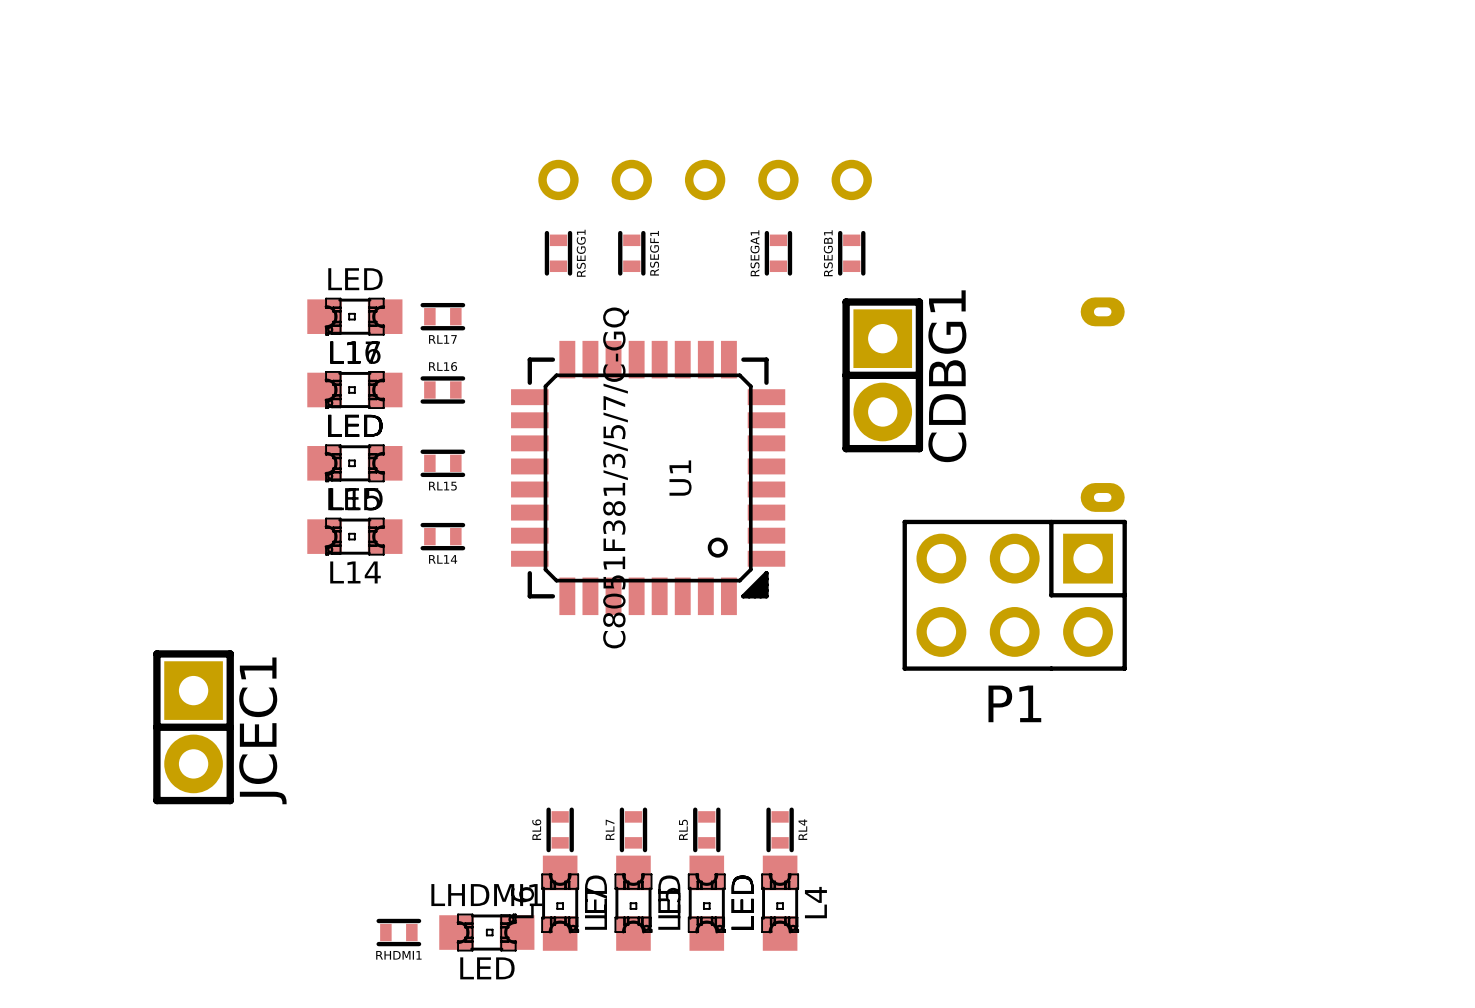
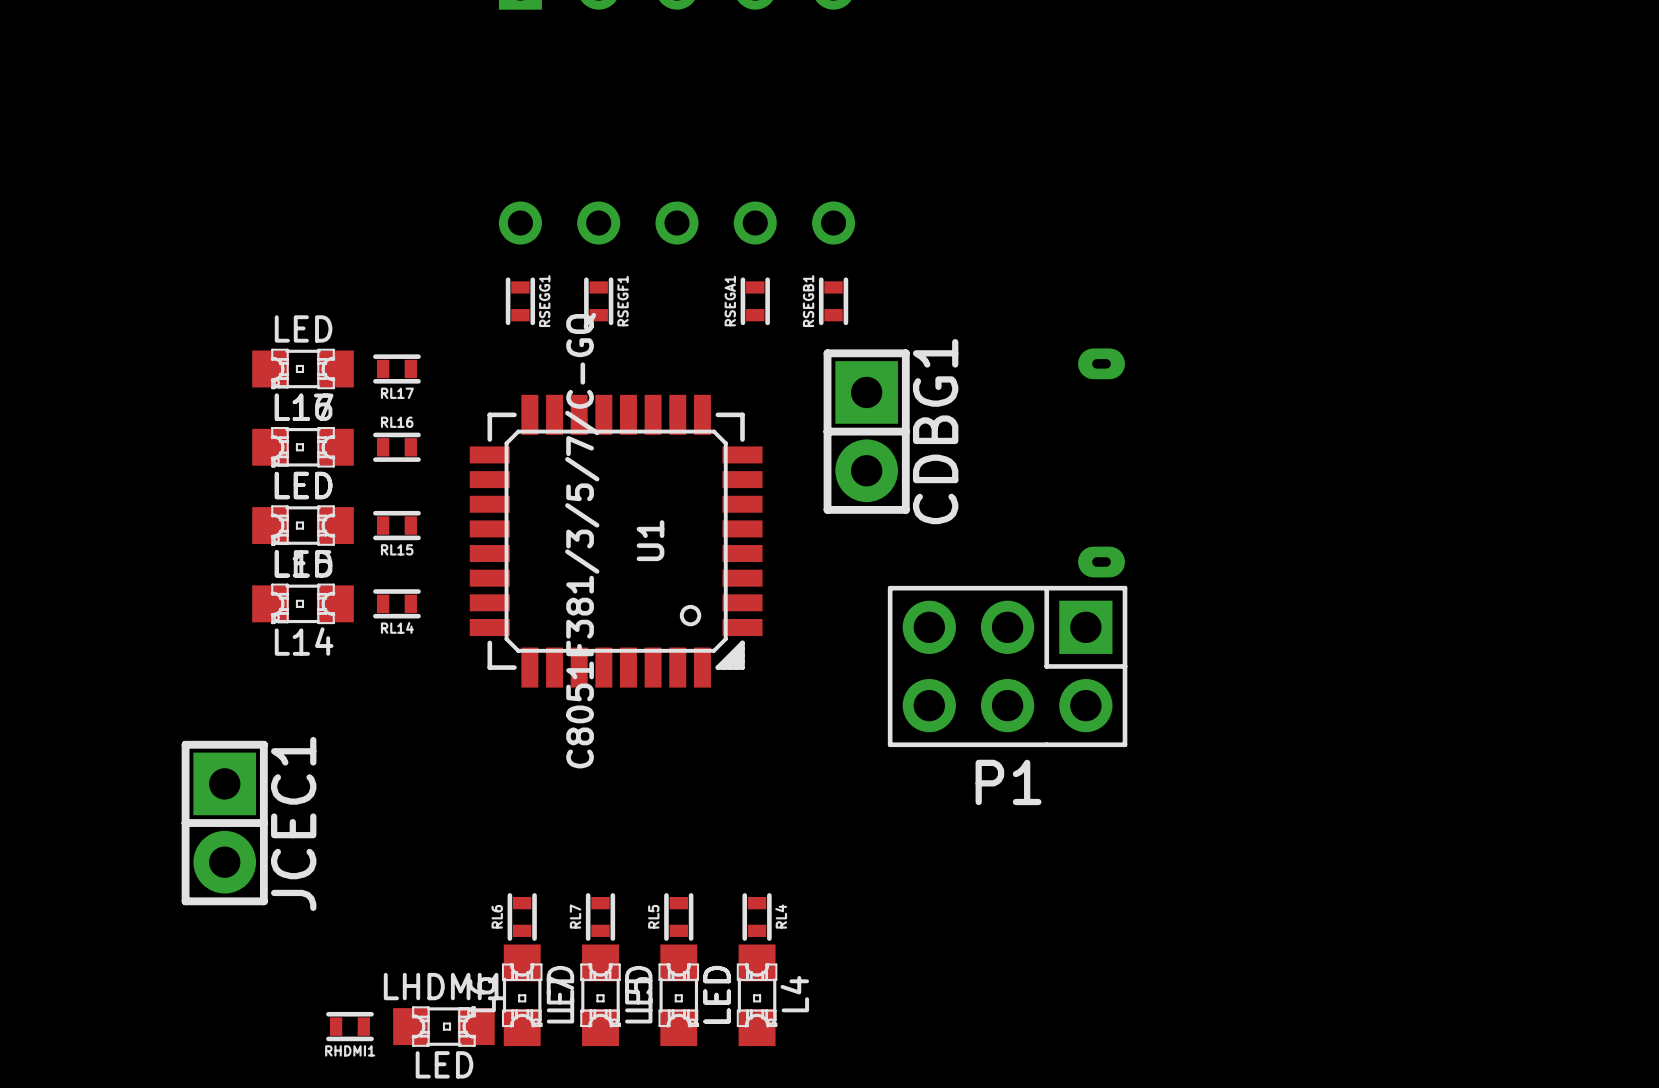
JCEC1 position: (193, 727) -> (224, 823)

